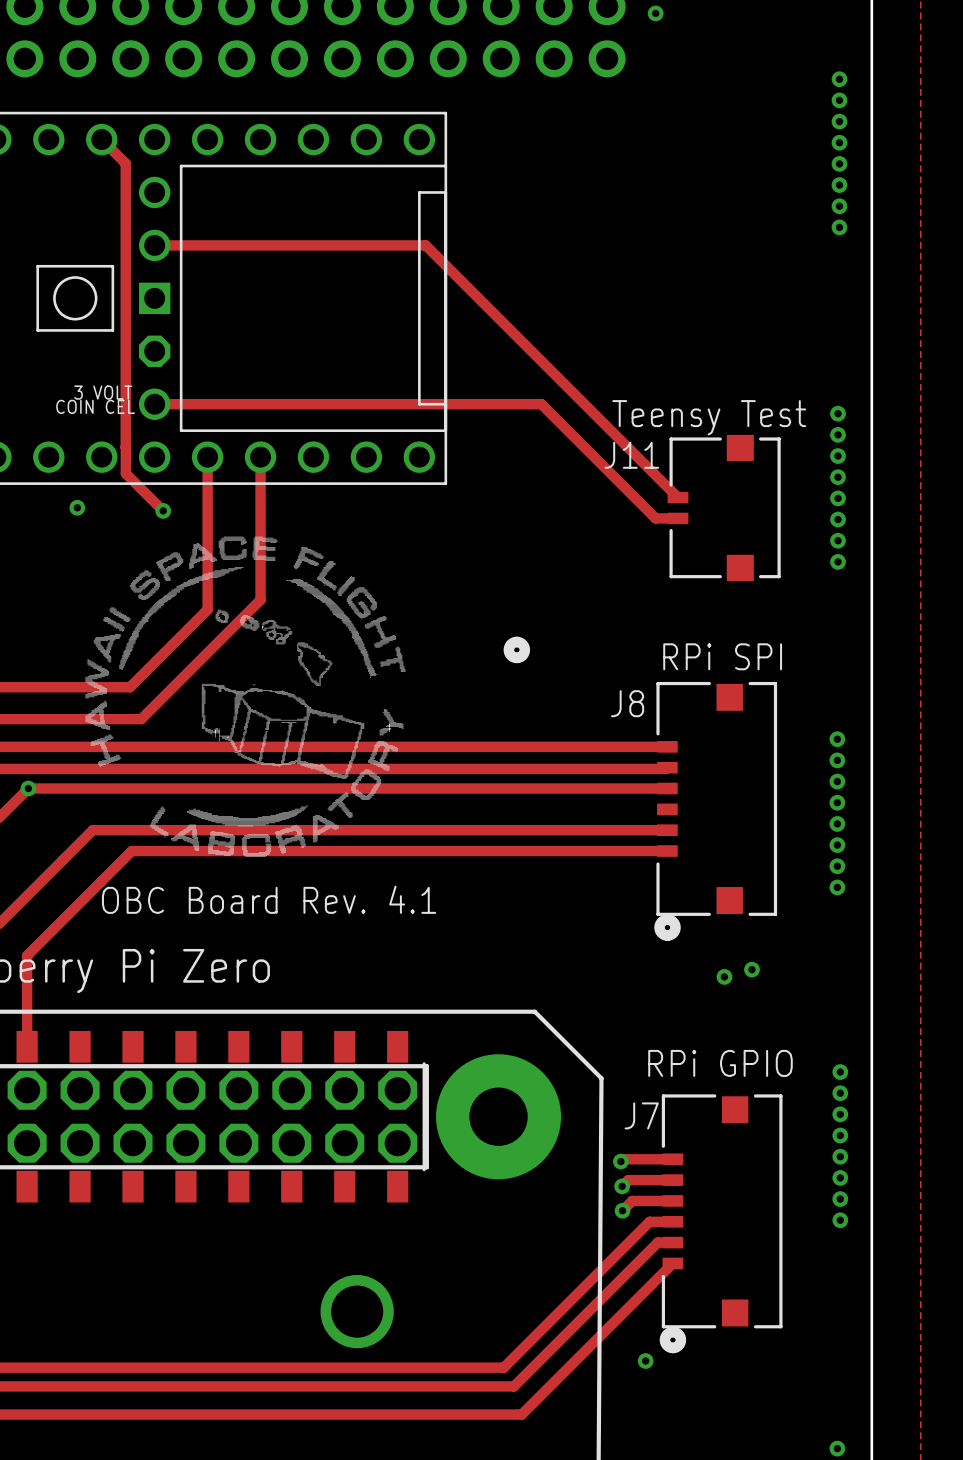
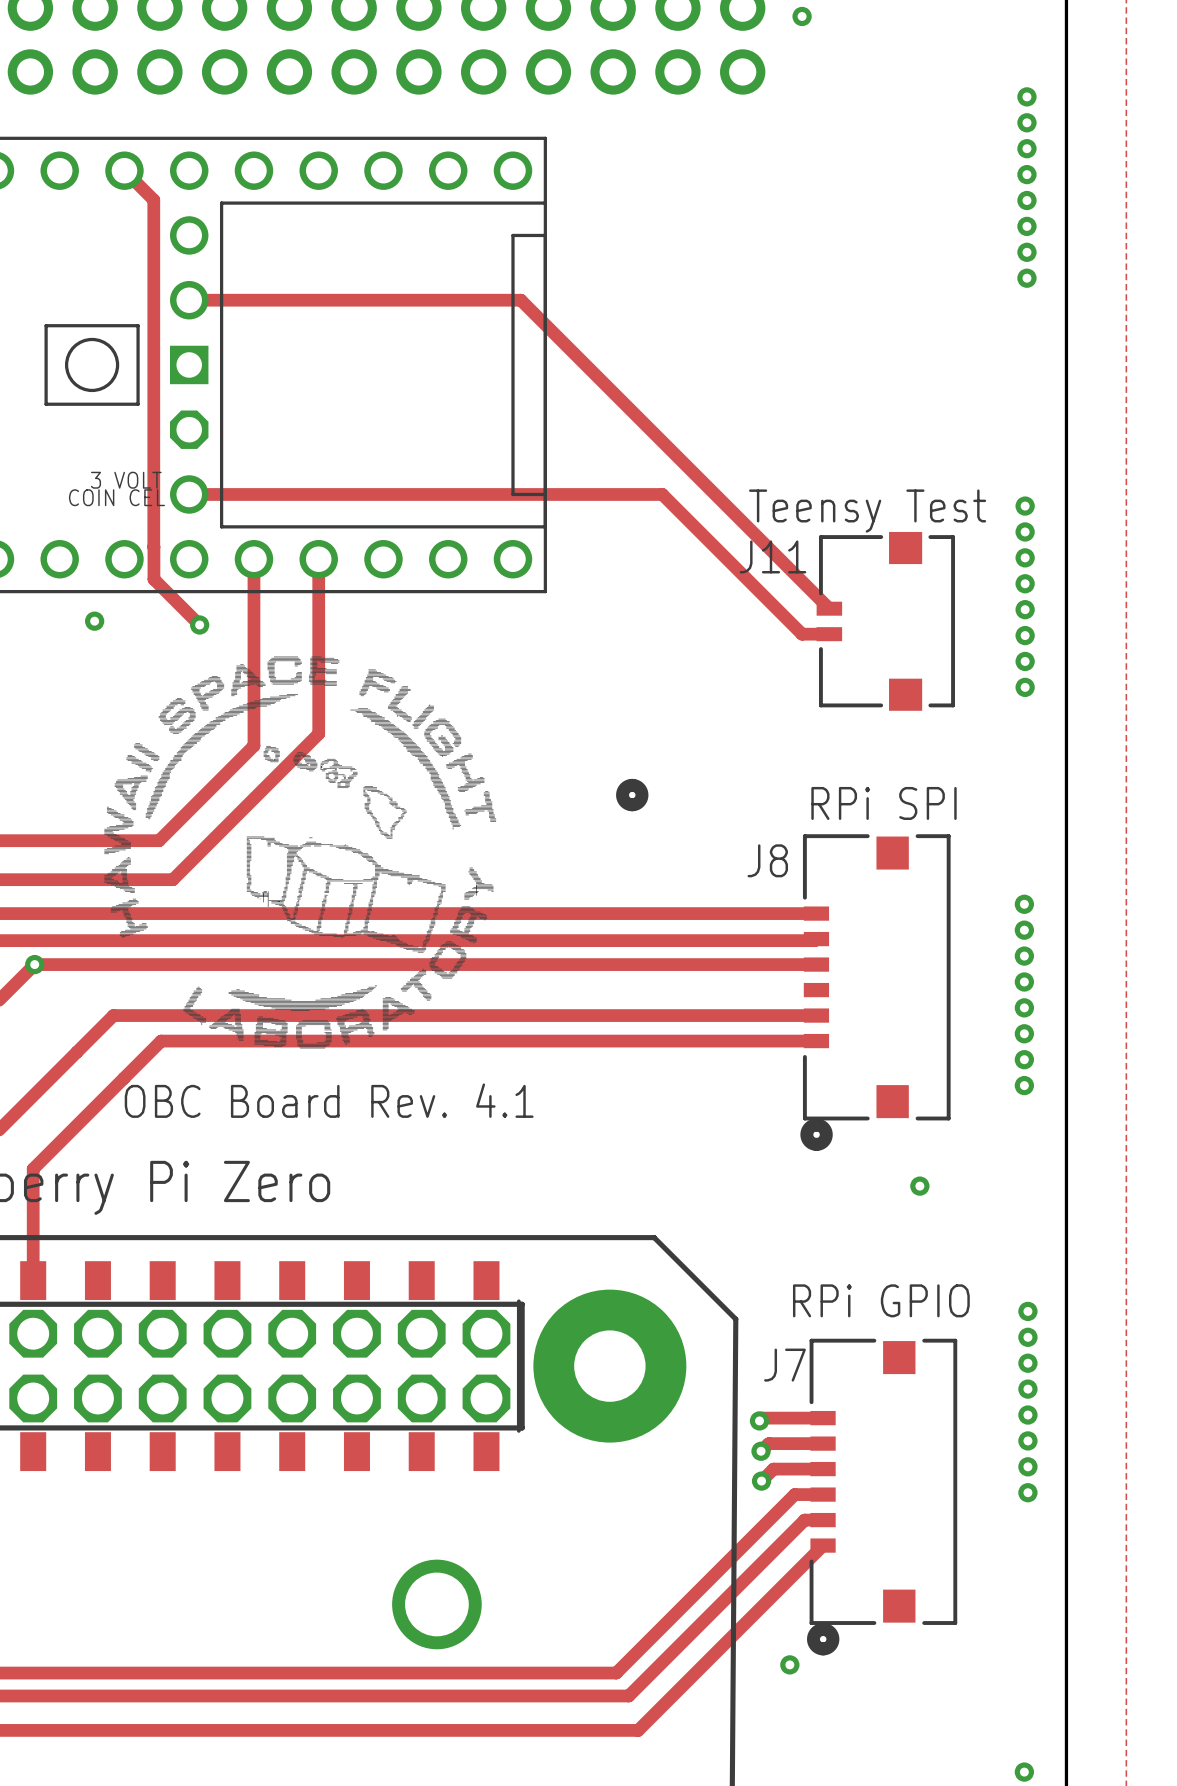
via: (724, 976) -> none

